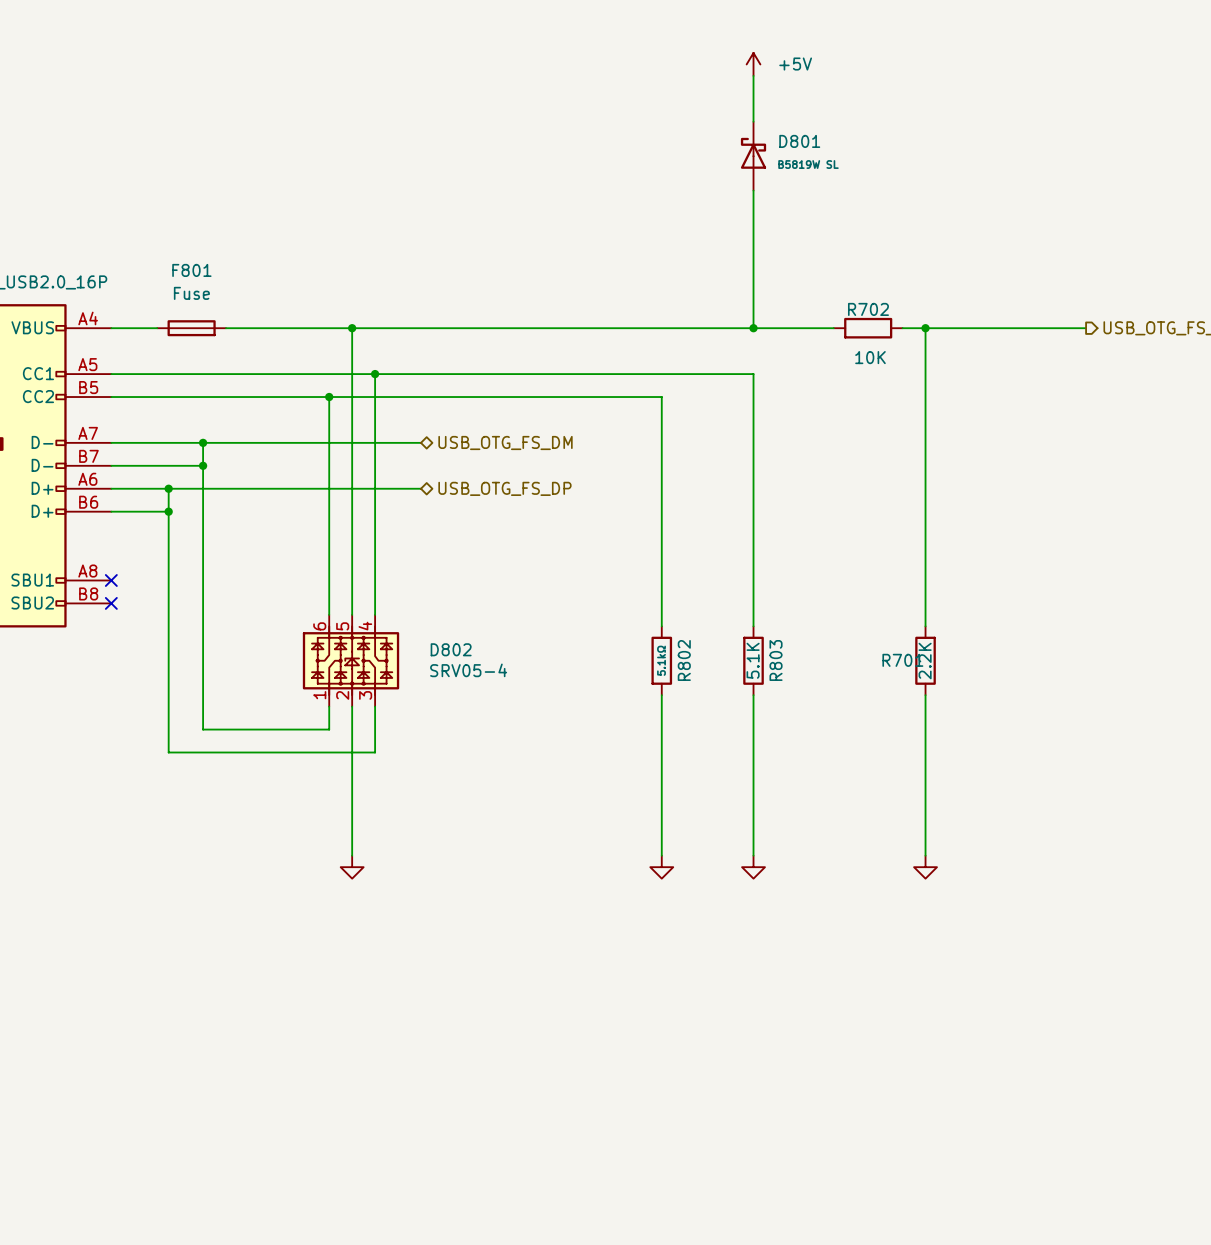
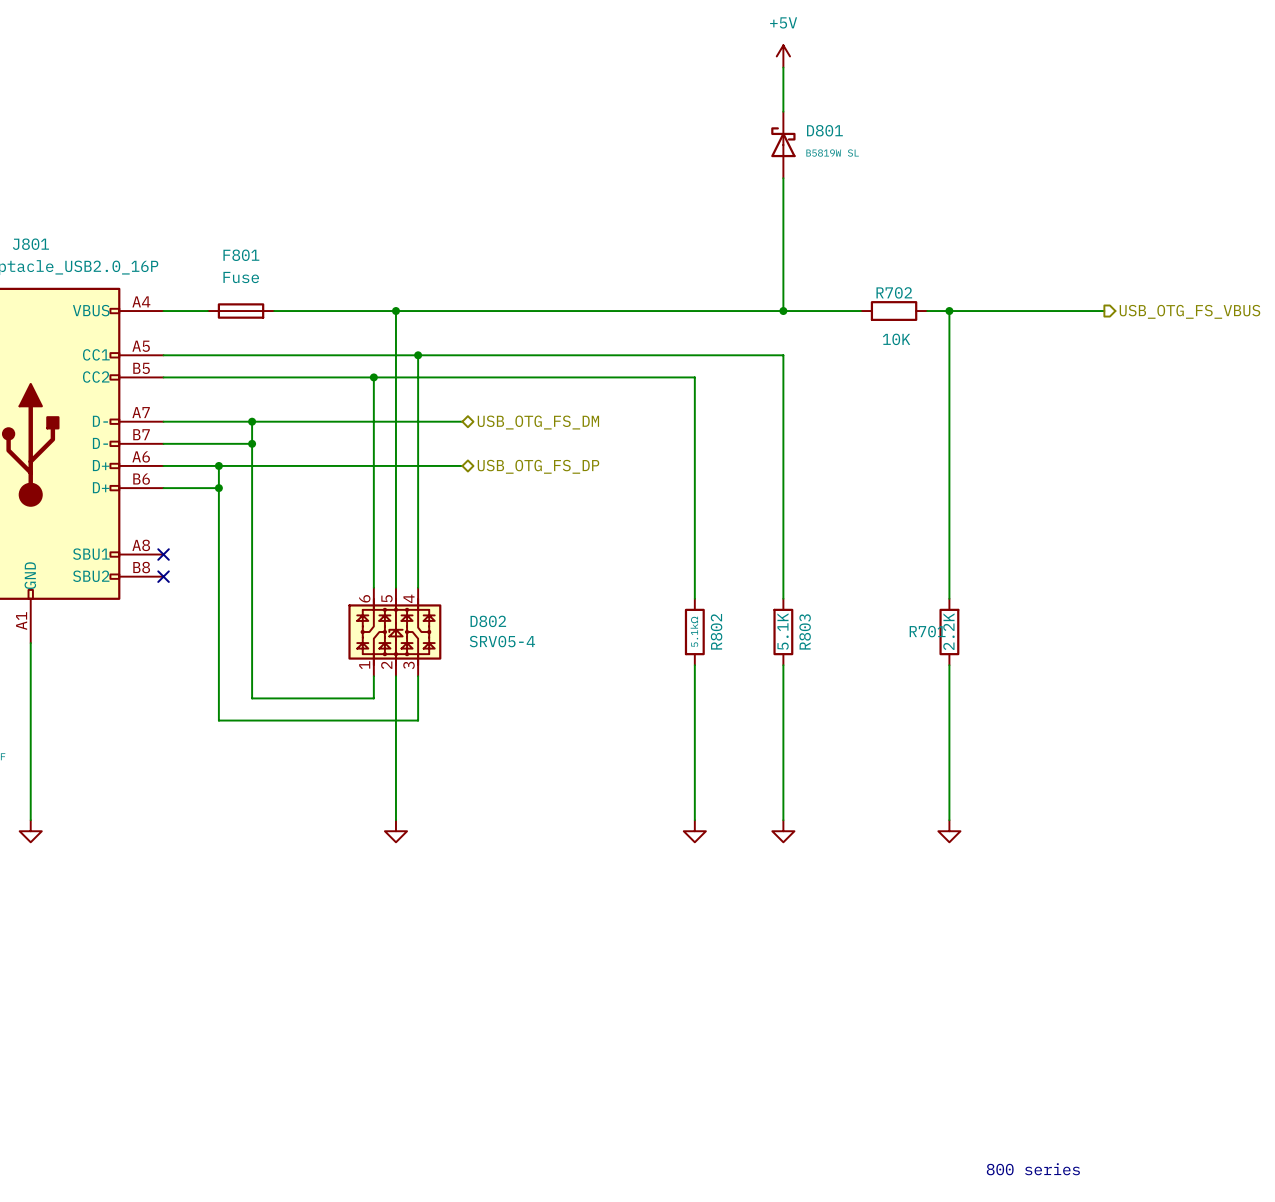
power symbol text position: +5V (795, 64) -> +5V (783, 22)
text: none -> 800 series (1033, 1169)

